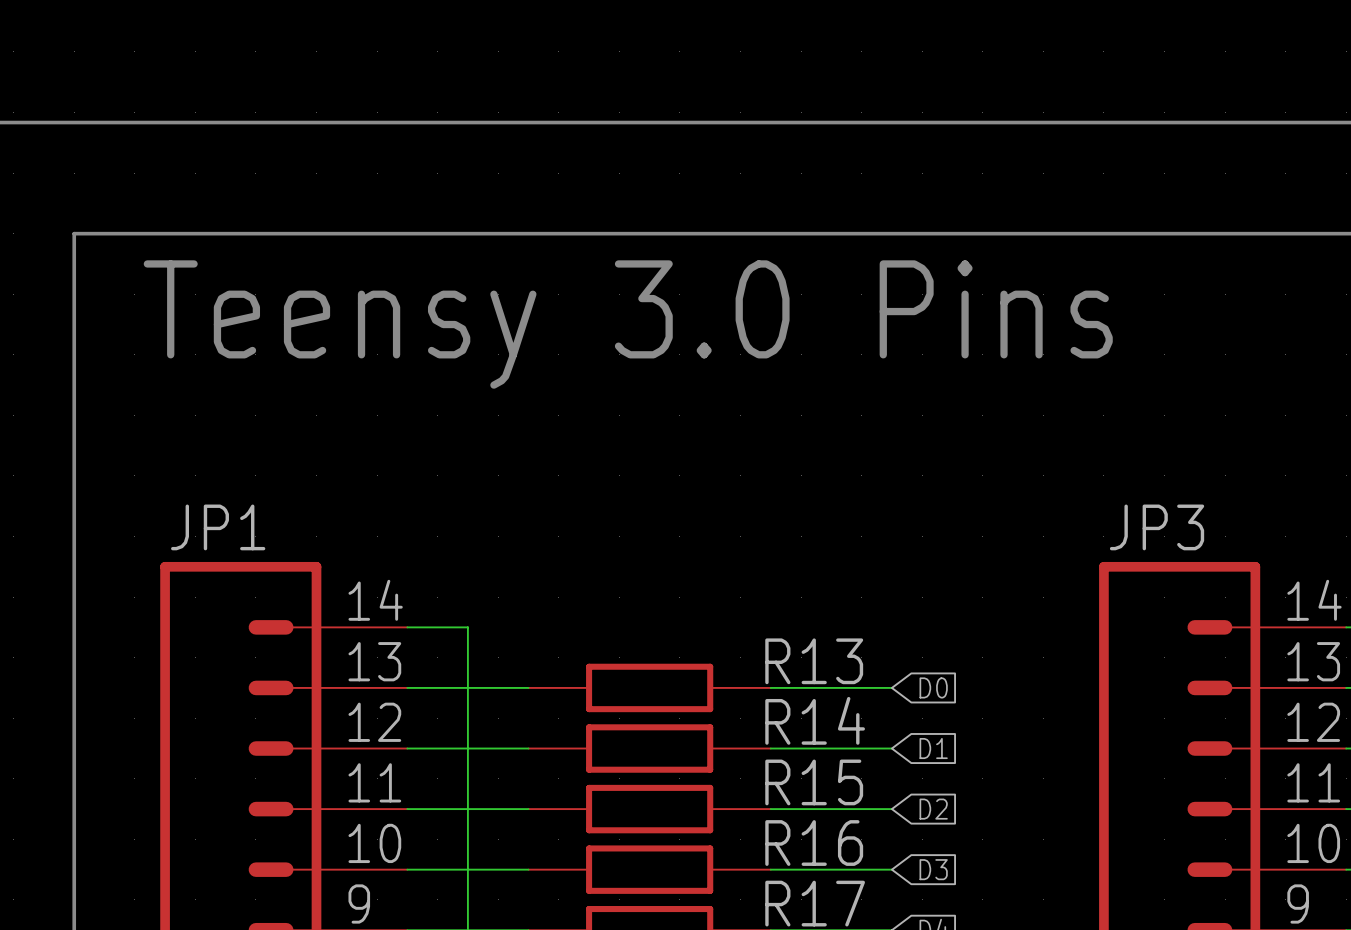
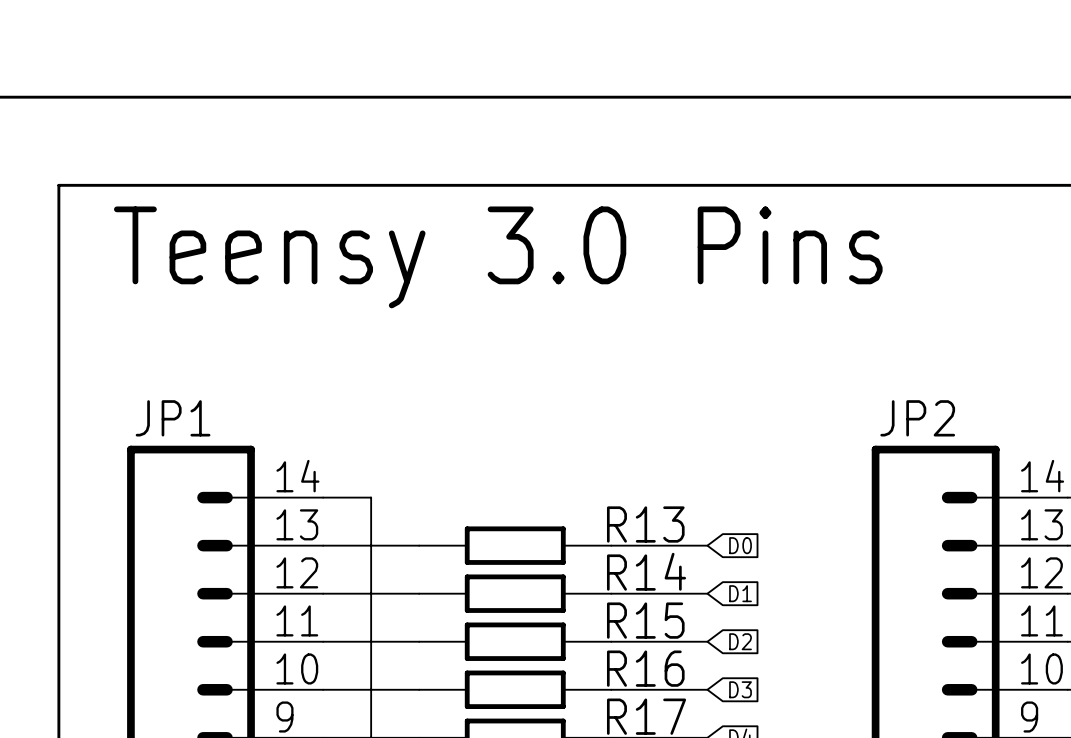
JP3 name: JP3 (1157, 527) -> JP2 (917, 418)

